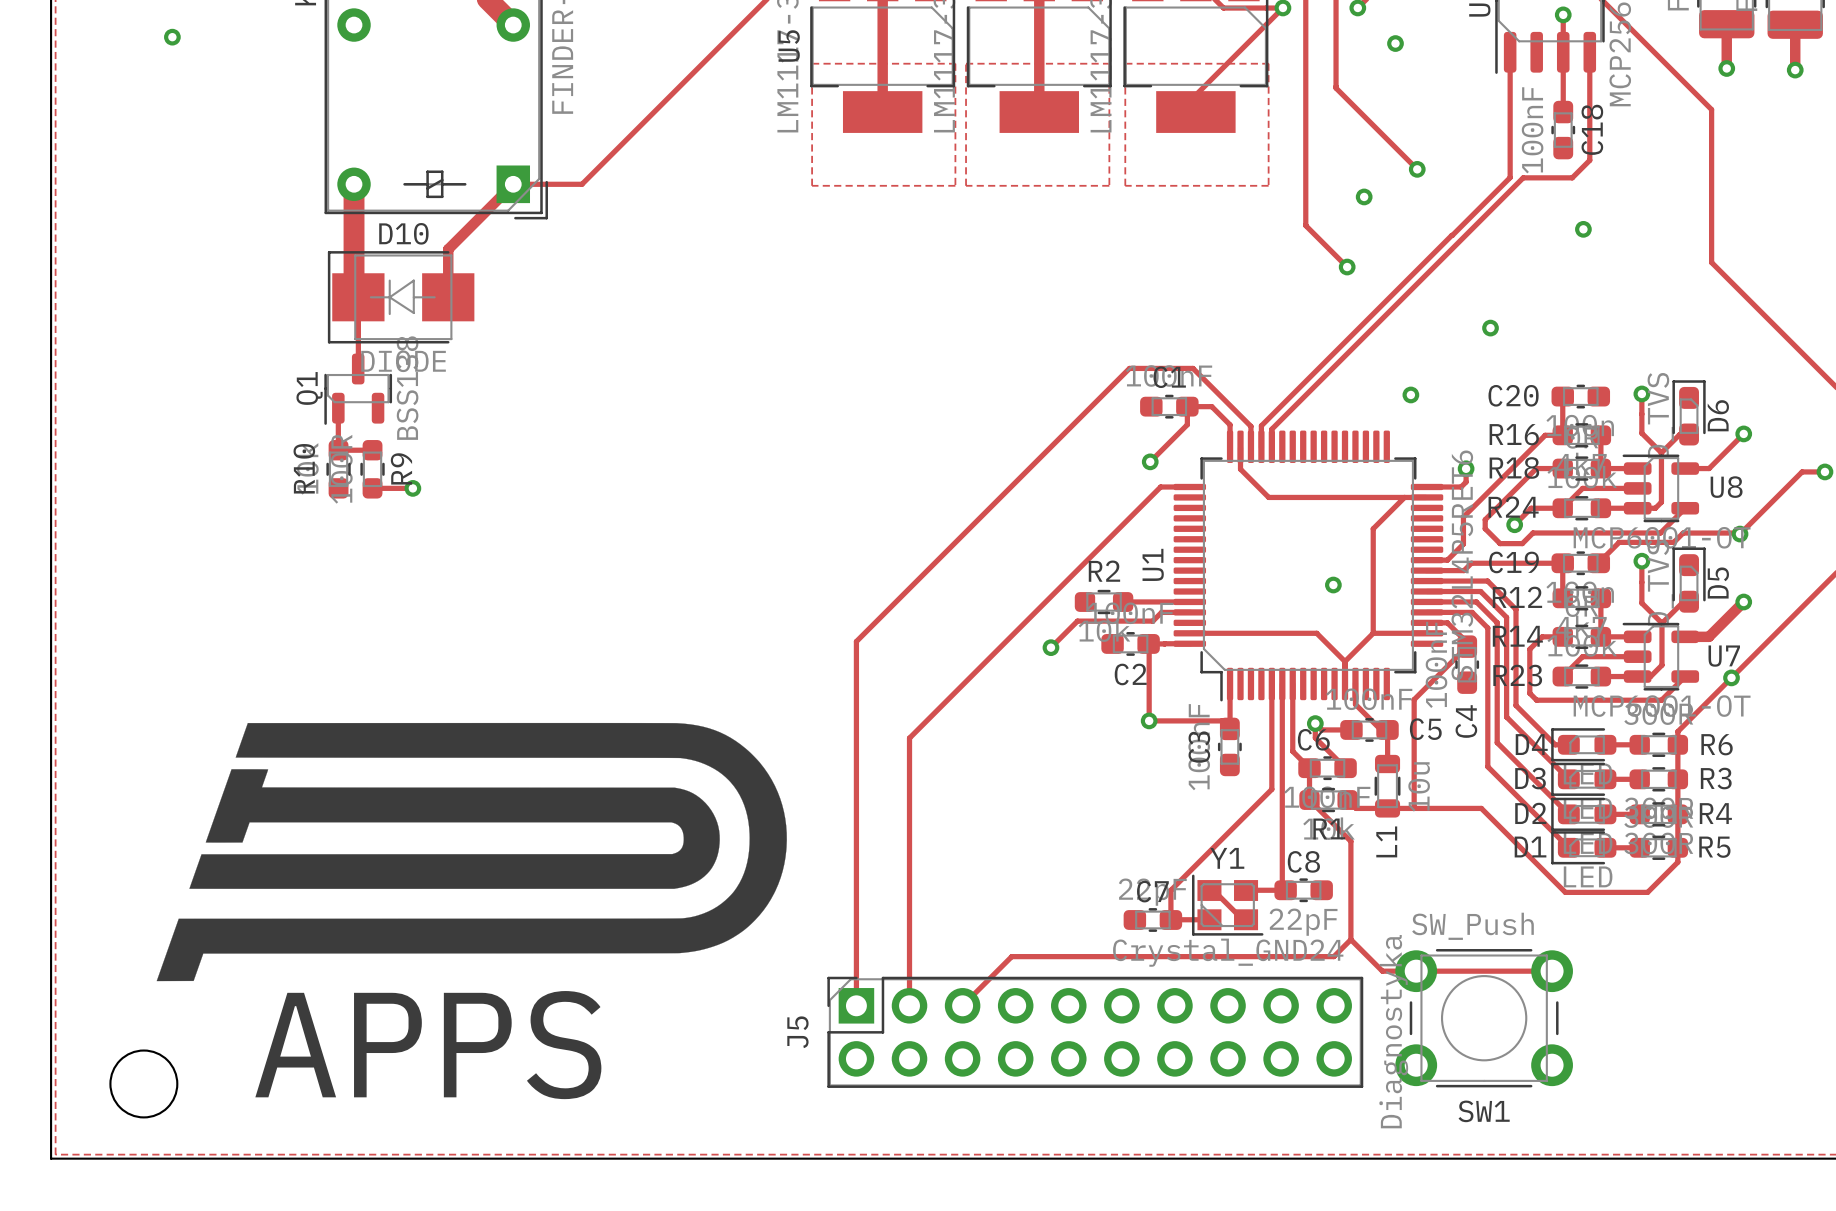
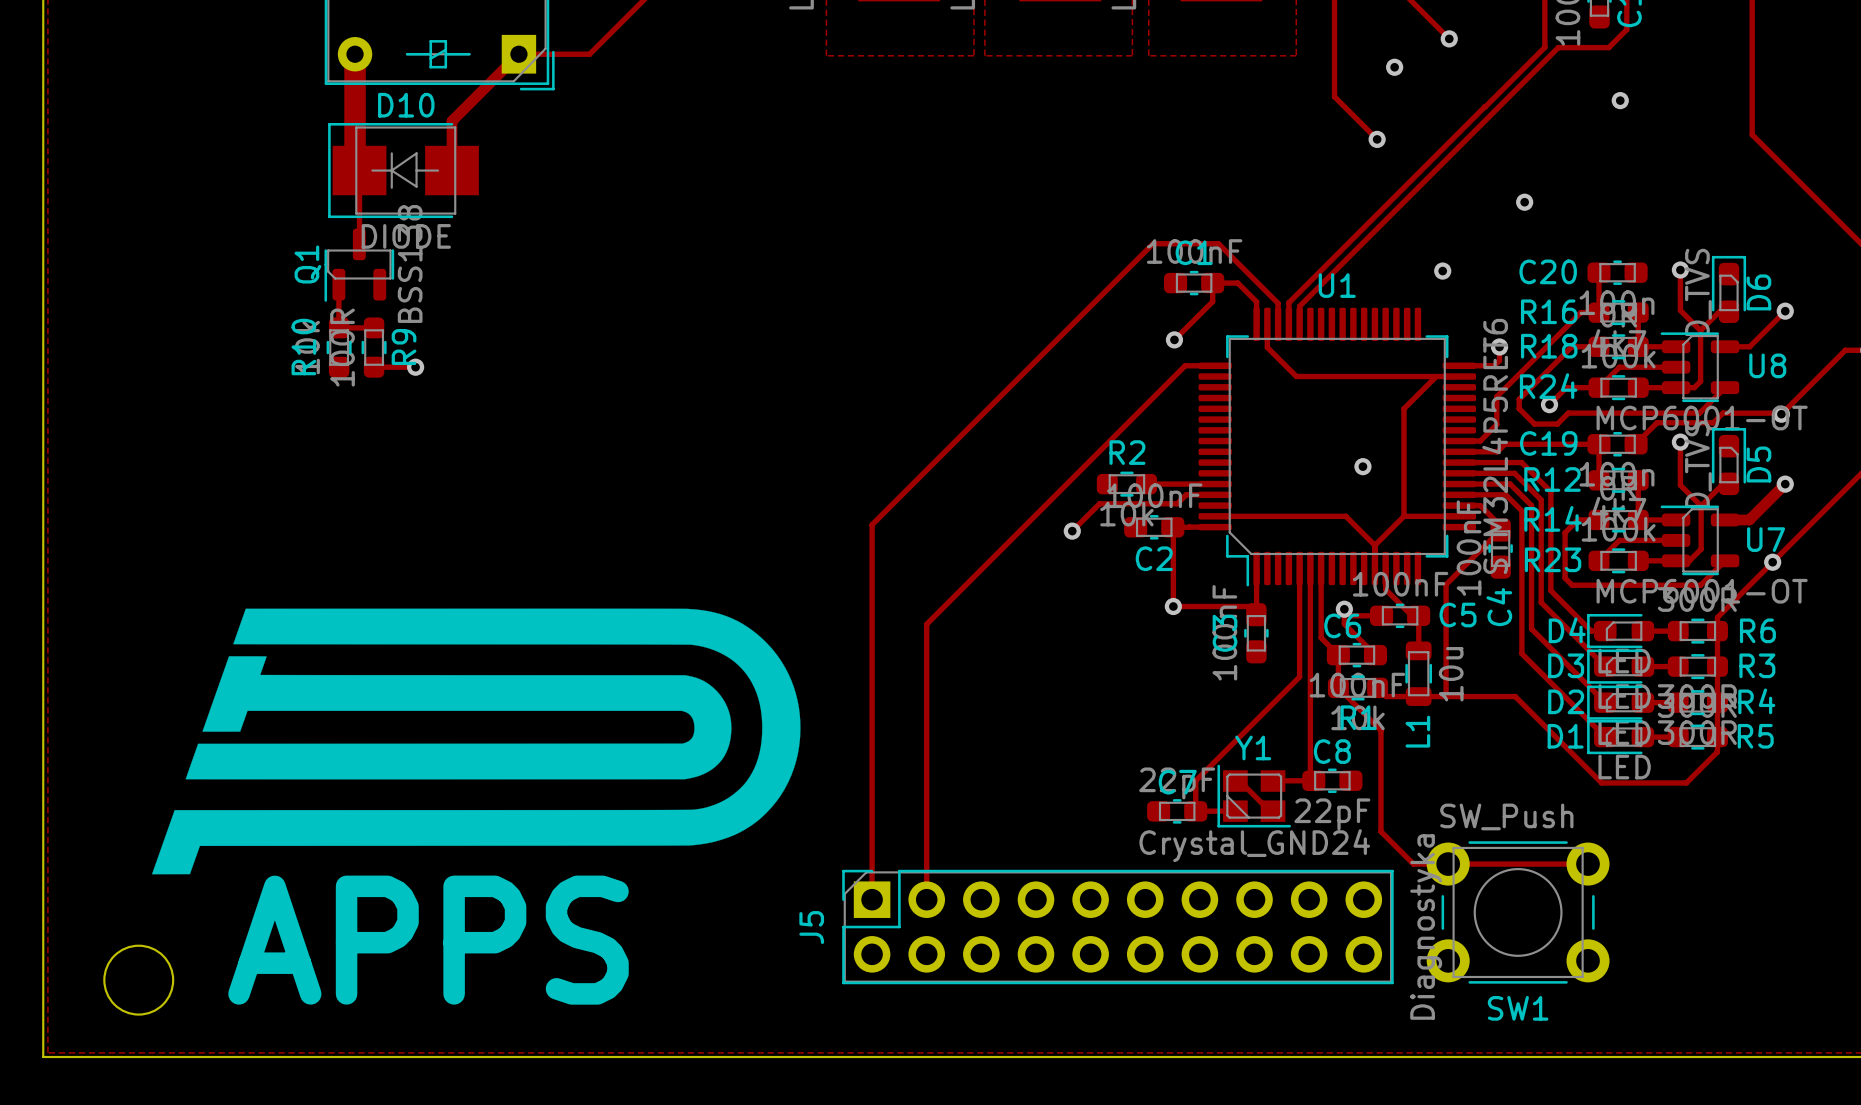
U1 name rotation: 0° (1153, 564) -> 90° clockwise (1337, 285)
U1 name position: U1 (1153, 564) -> U1 (1337, 285)
track: (1350, 939) (1333, 956) (1011, 956) (962, 1005) -> none

